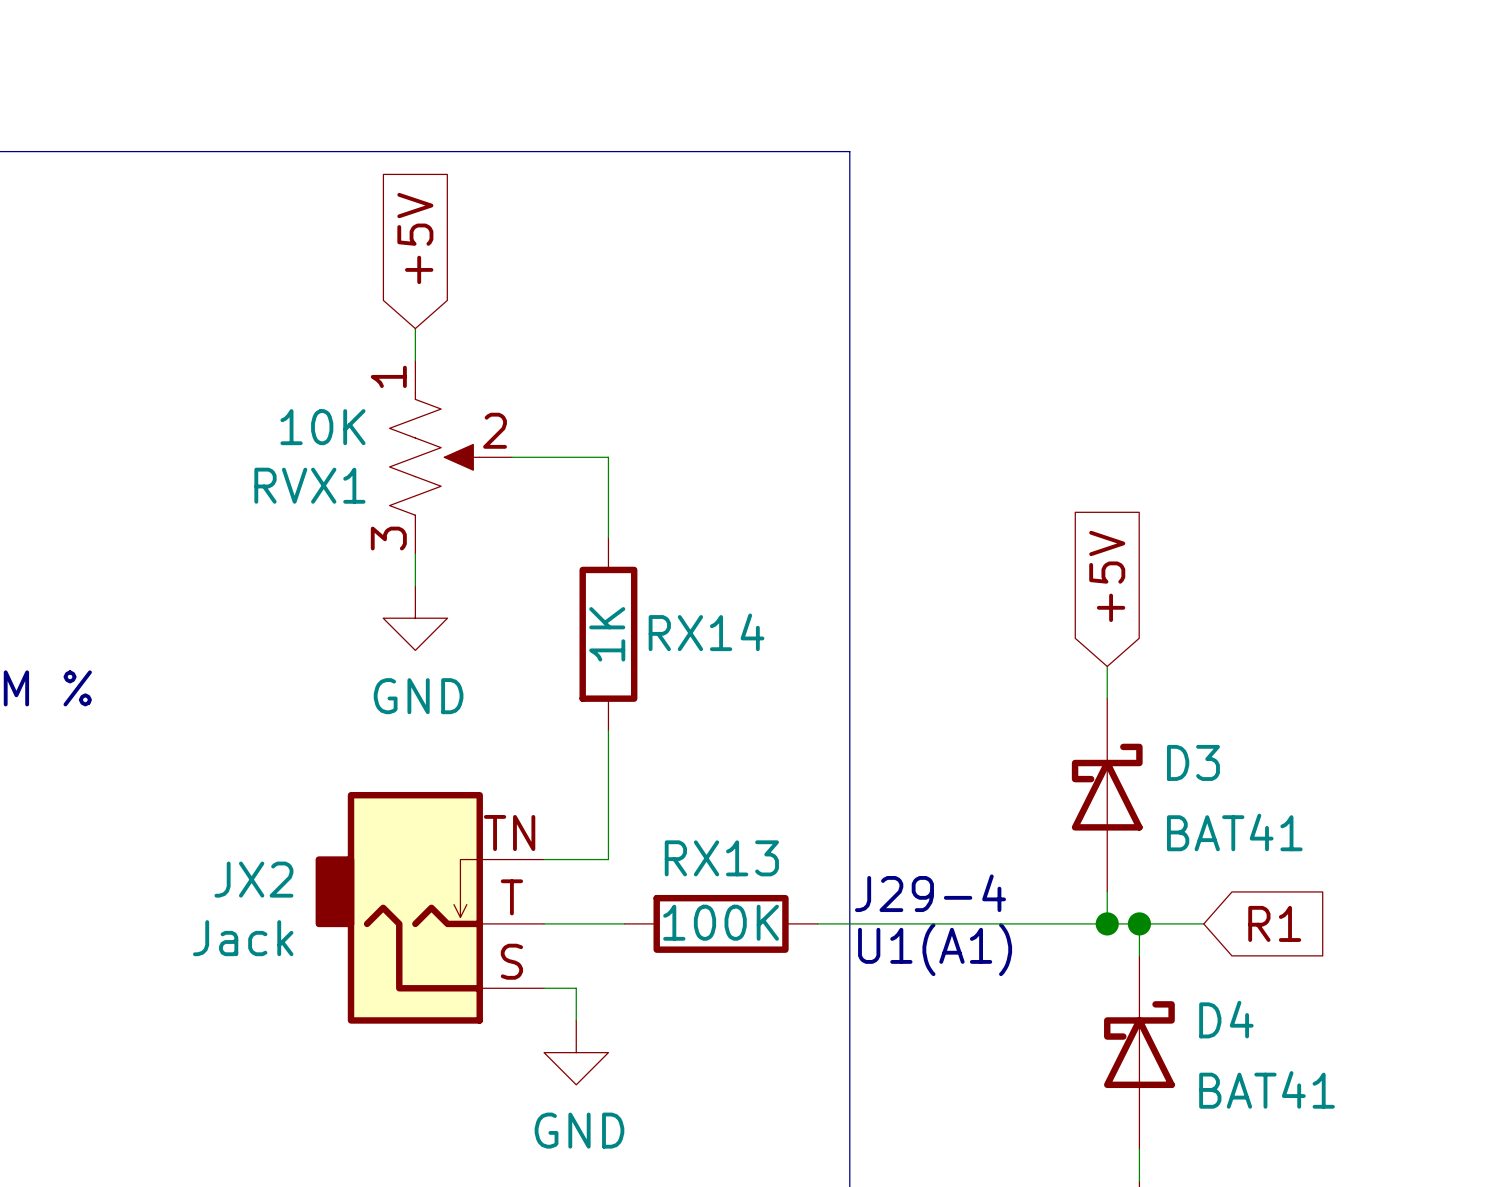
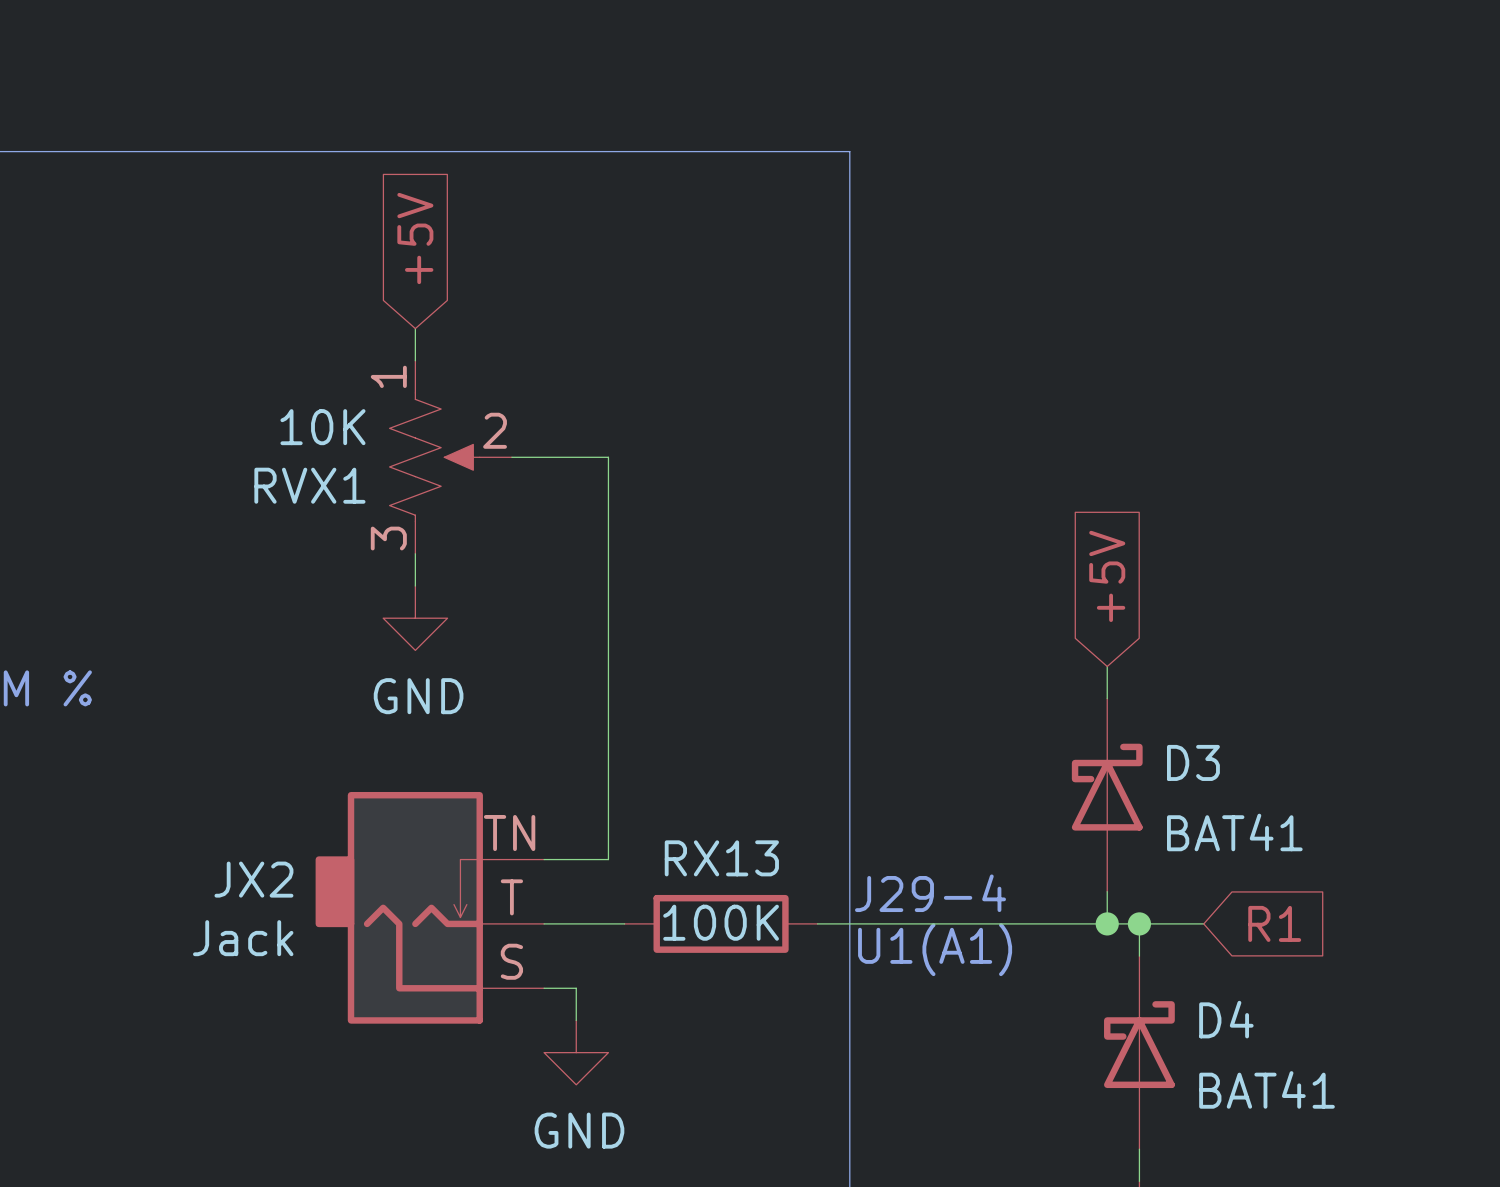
wire: none -> (608, 537) (608, 730)
RX14: 1K (608, 634) -> none

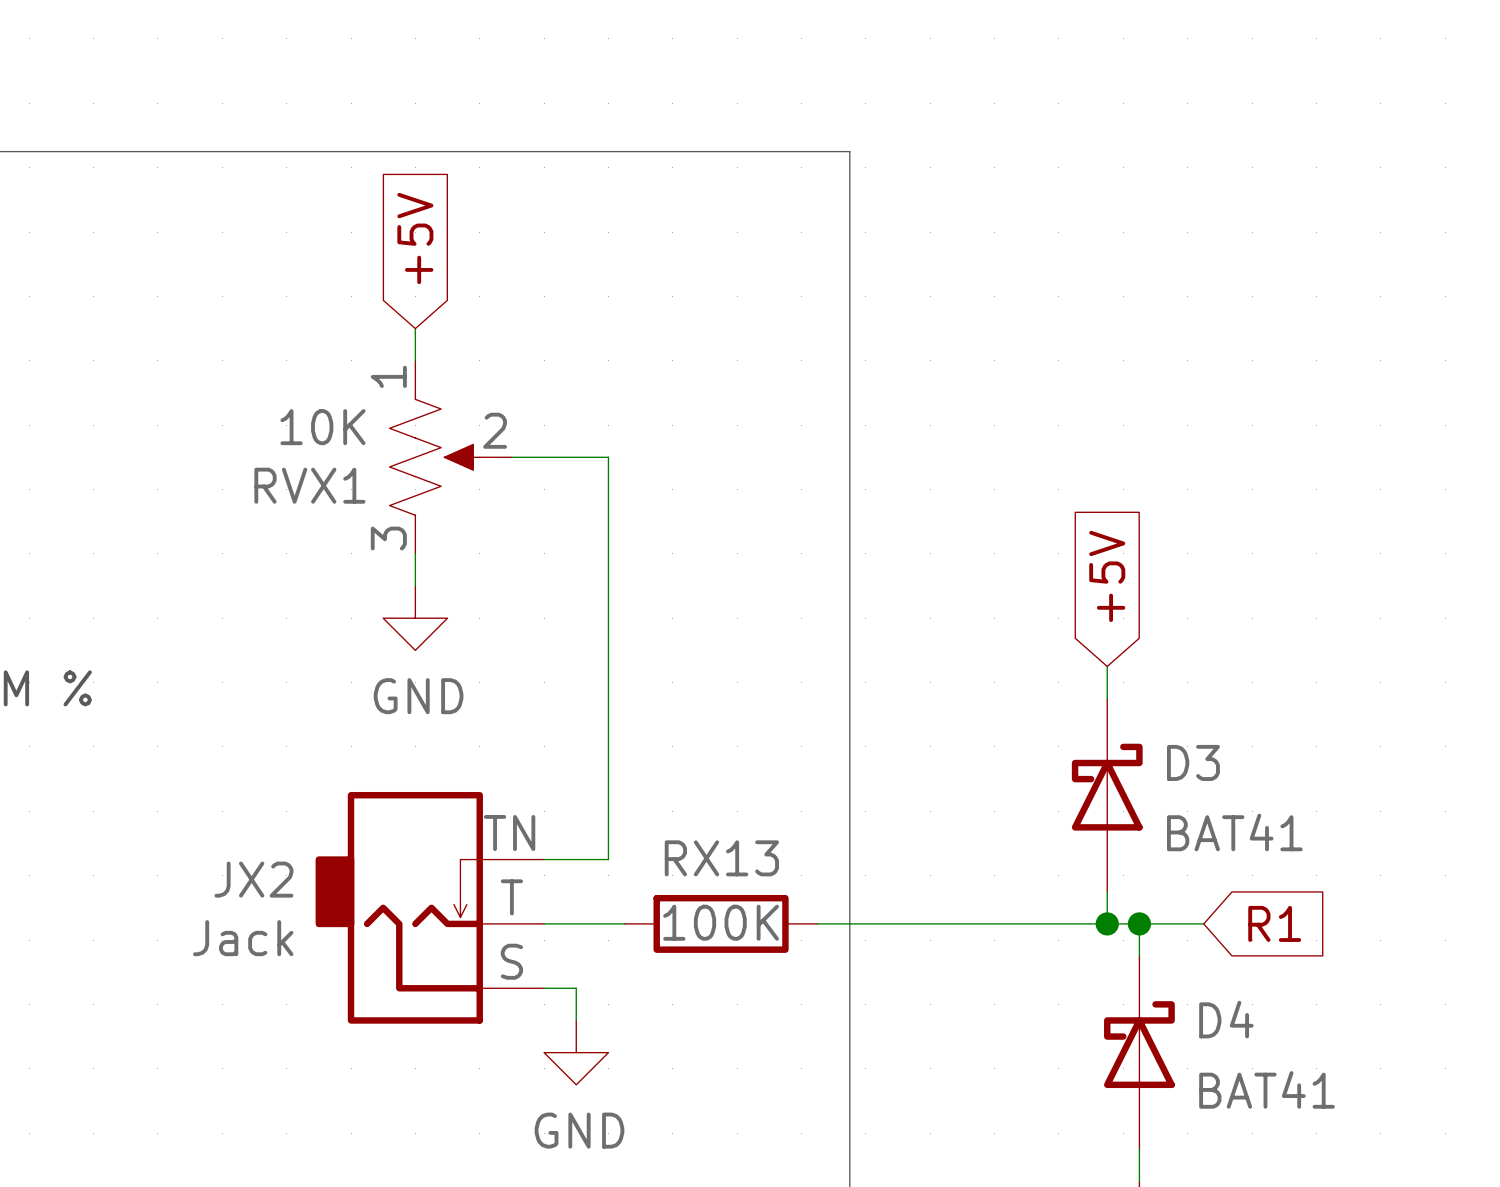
text: J29-4 (930, 893) -> none
text: U1(A1) (935, 949) -> none

